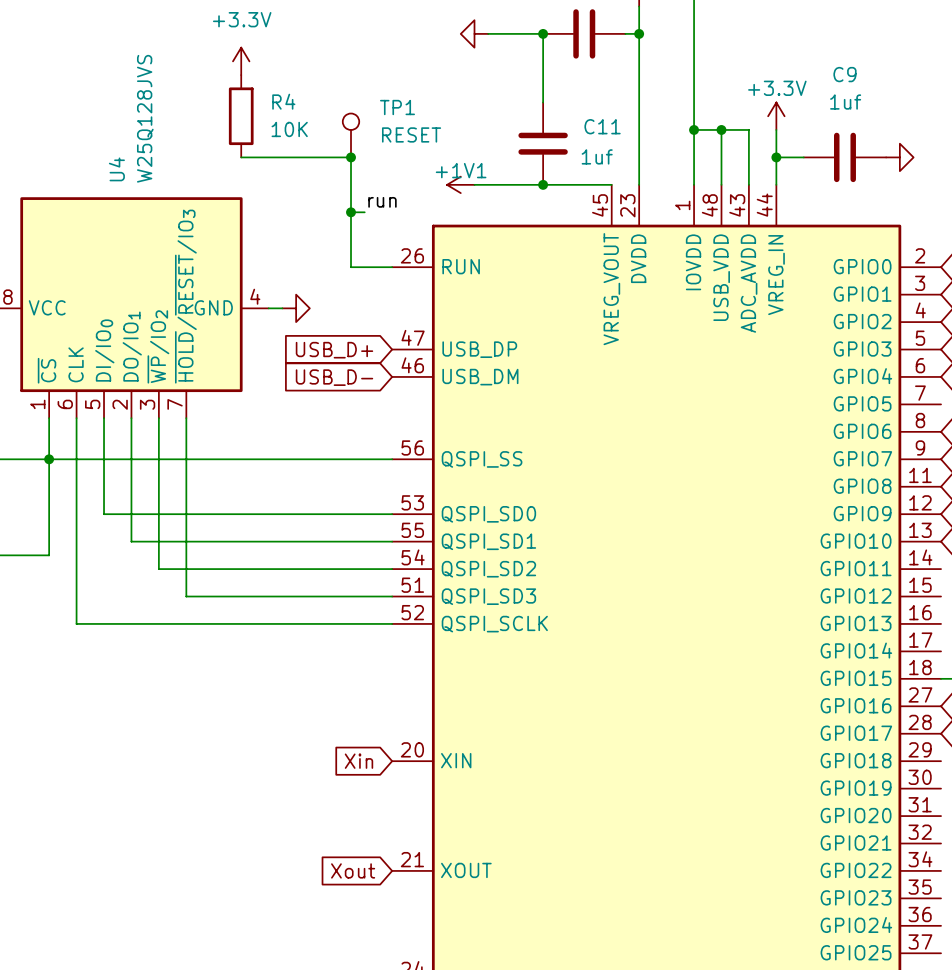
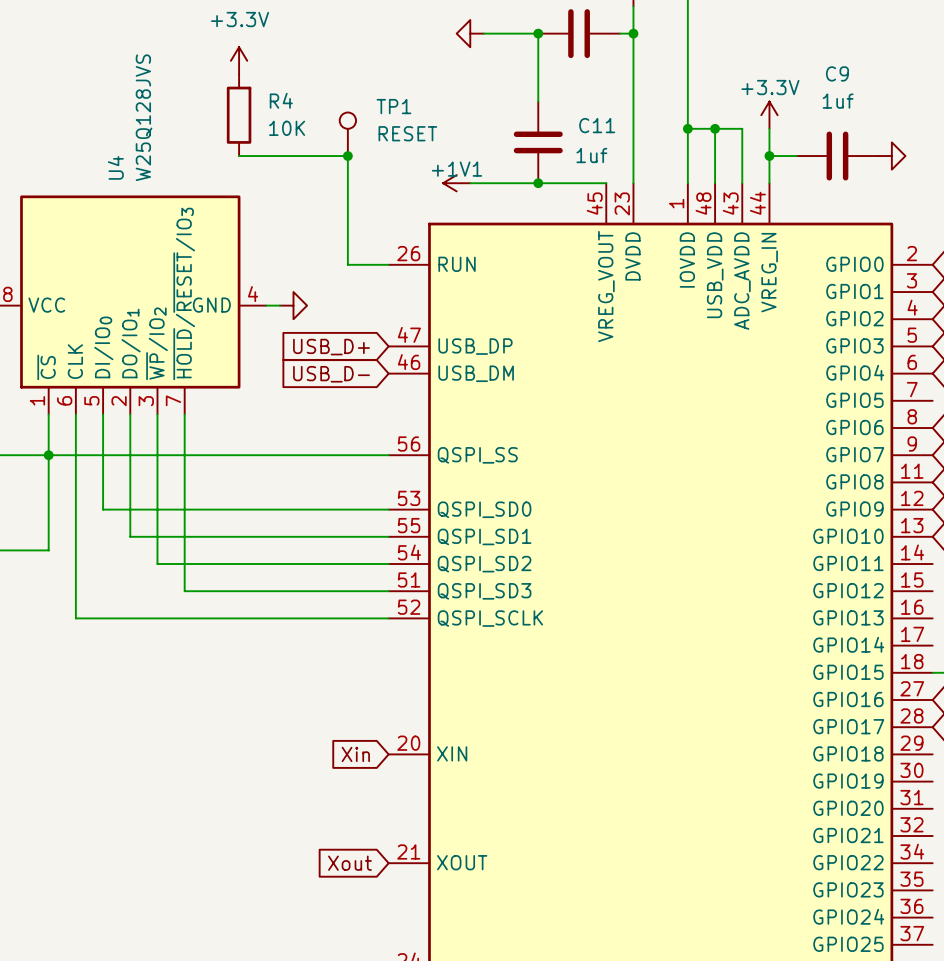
label: run (382, 202) -> none
wire: (351, 212) (364, 212) -> none
junction: (351, 212) -> none

